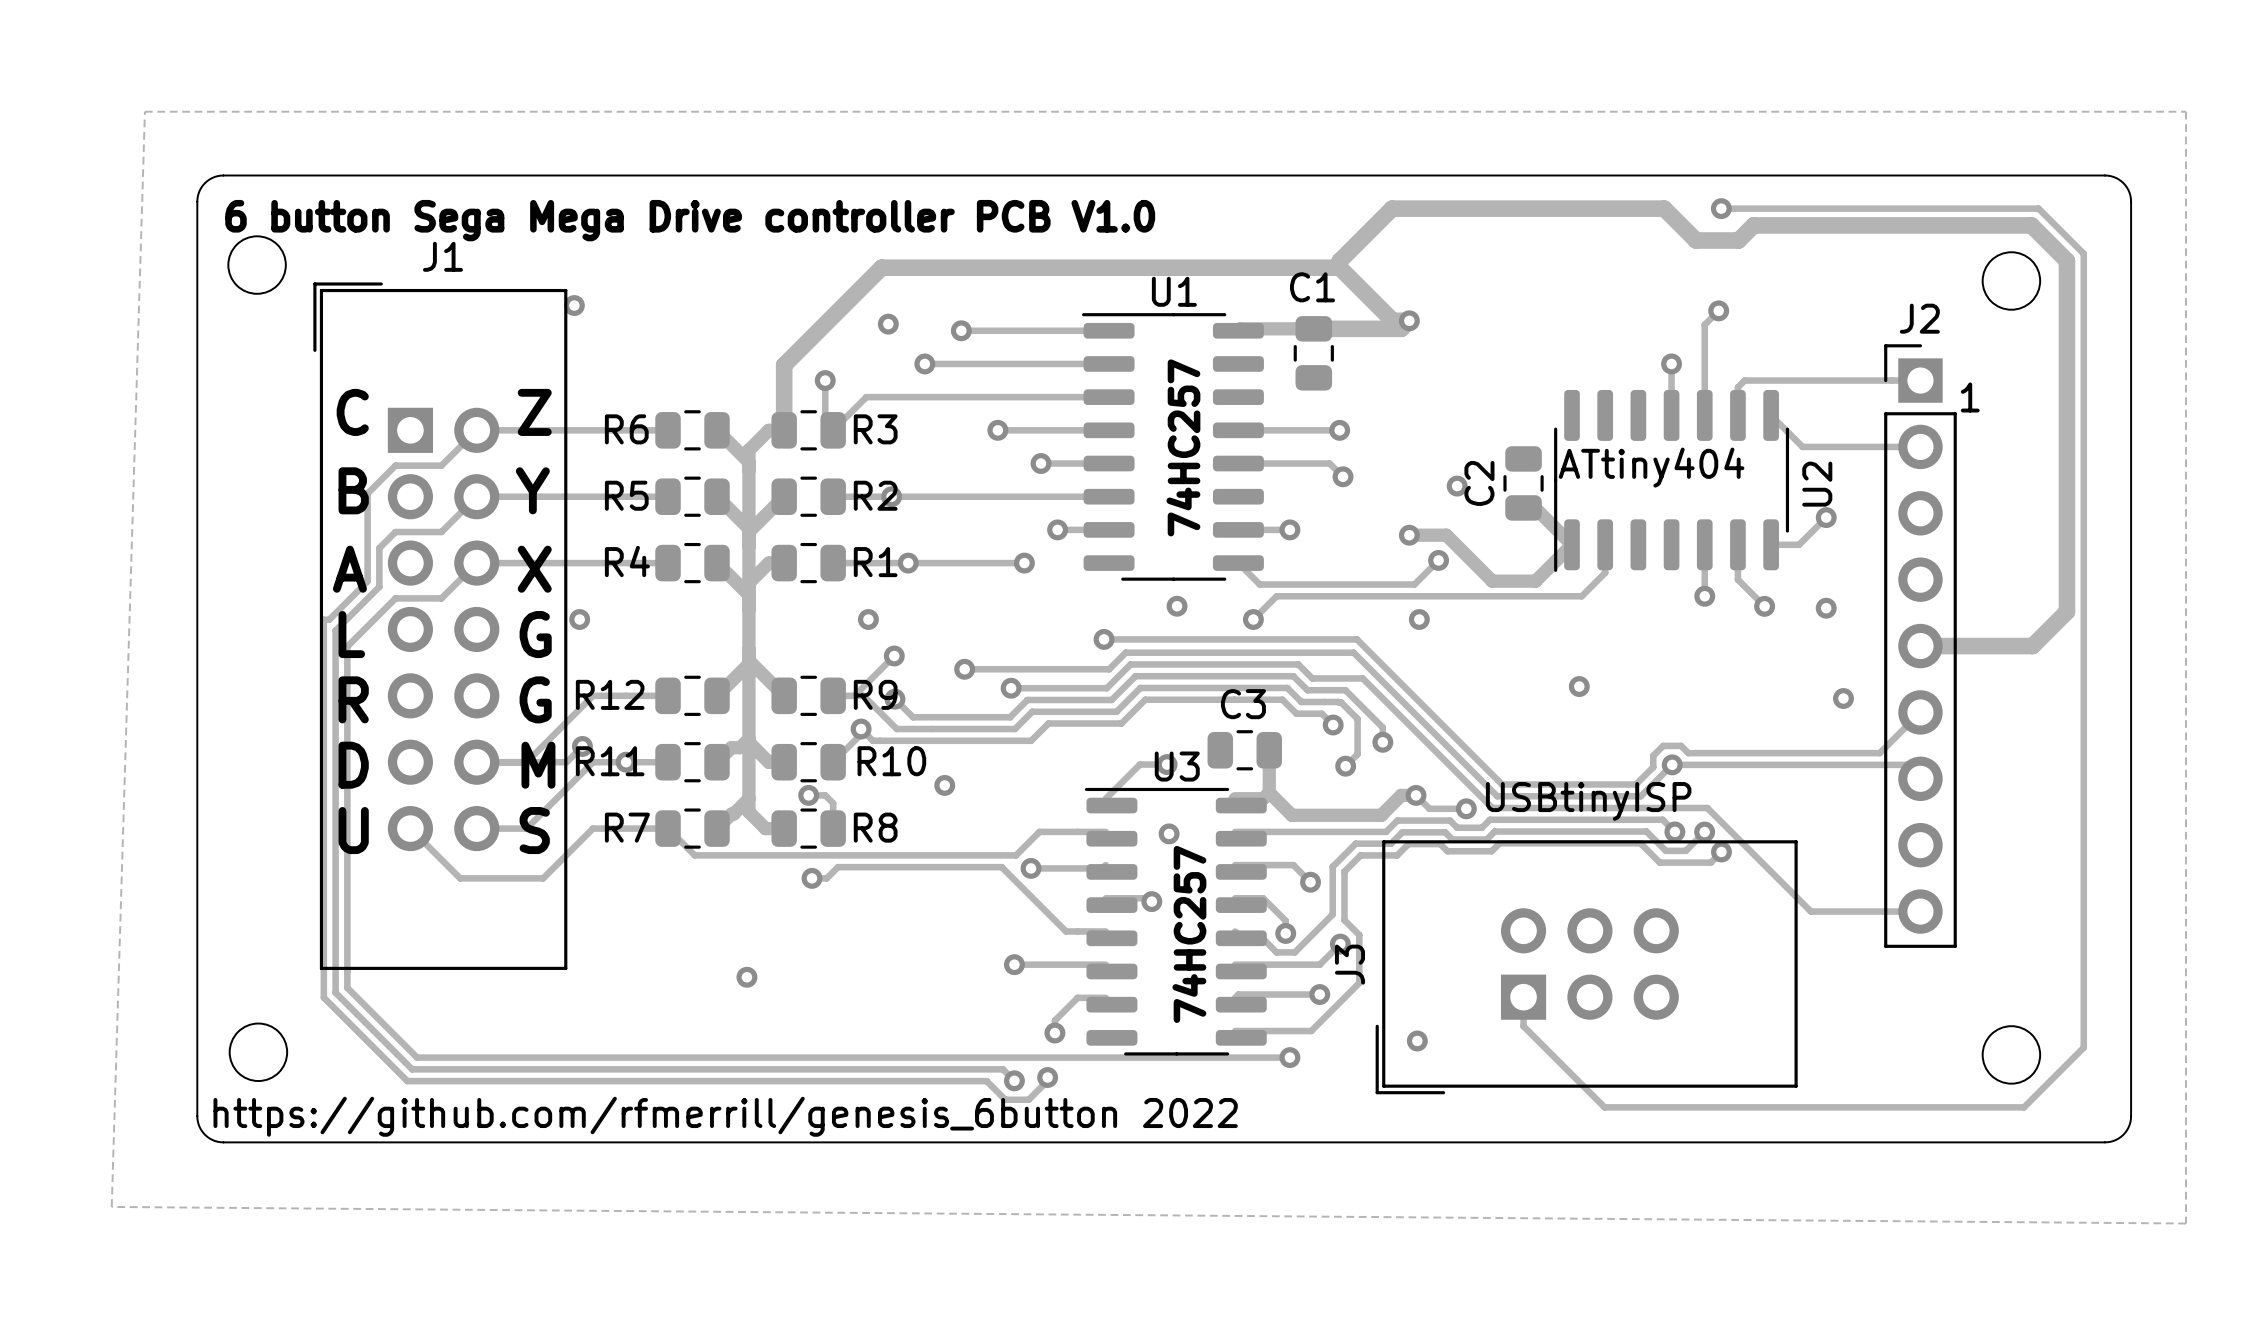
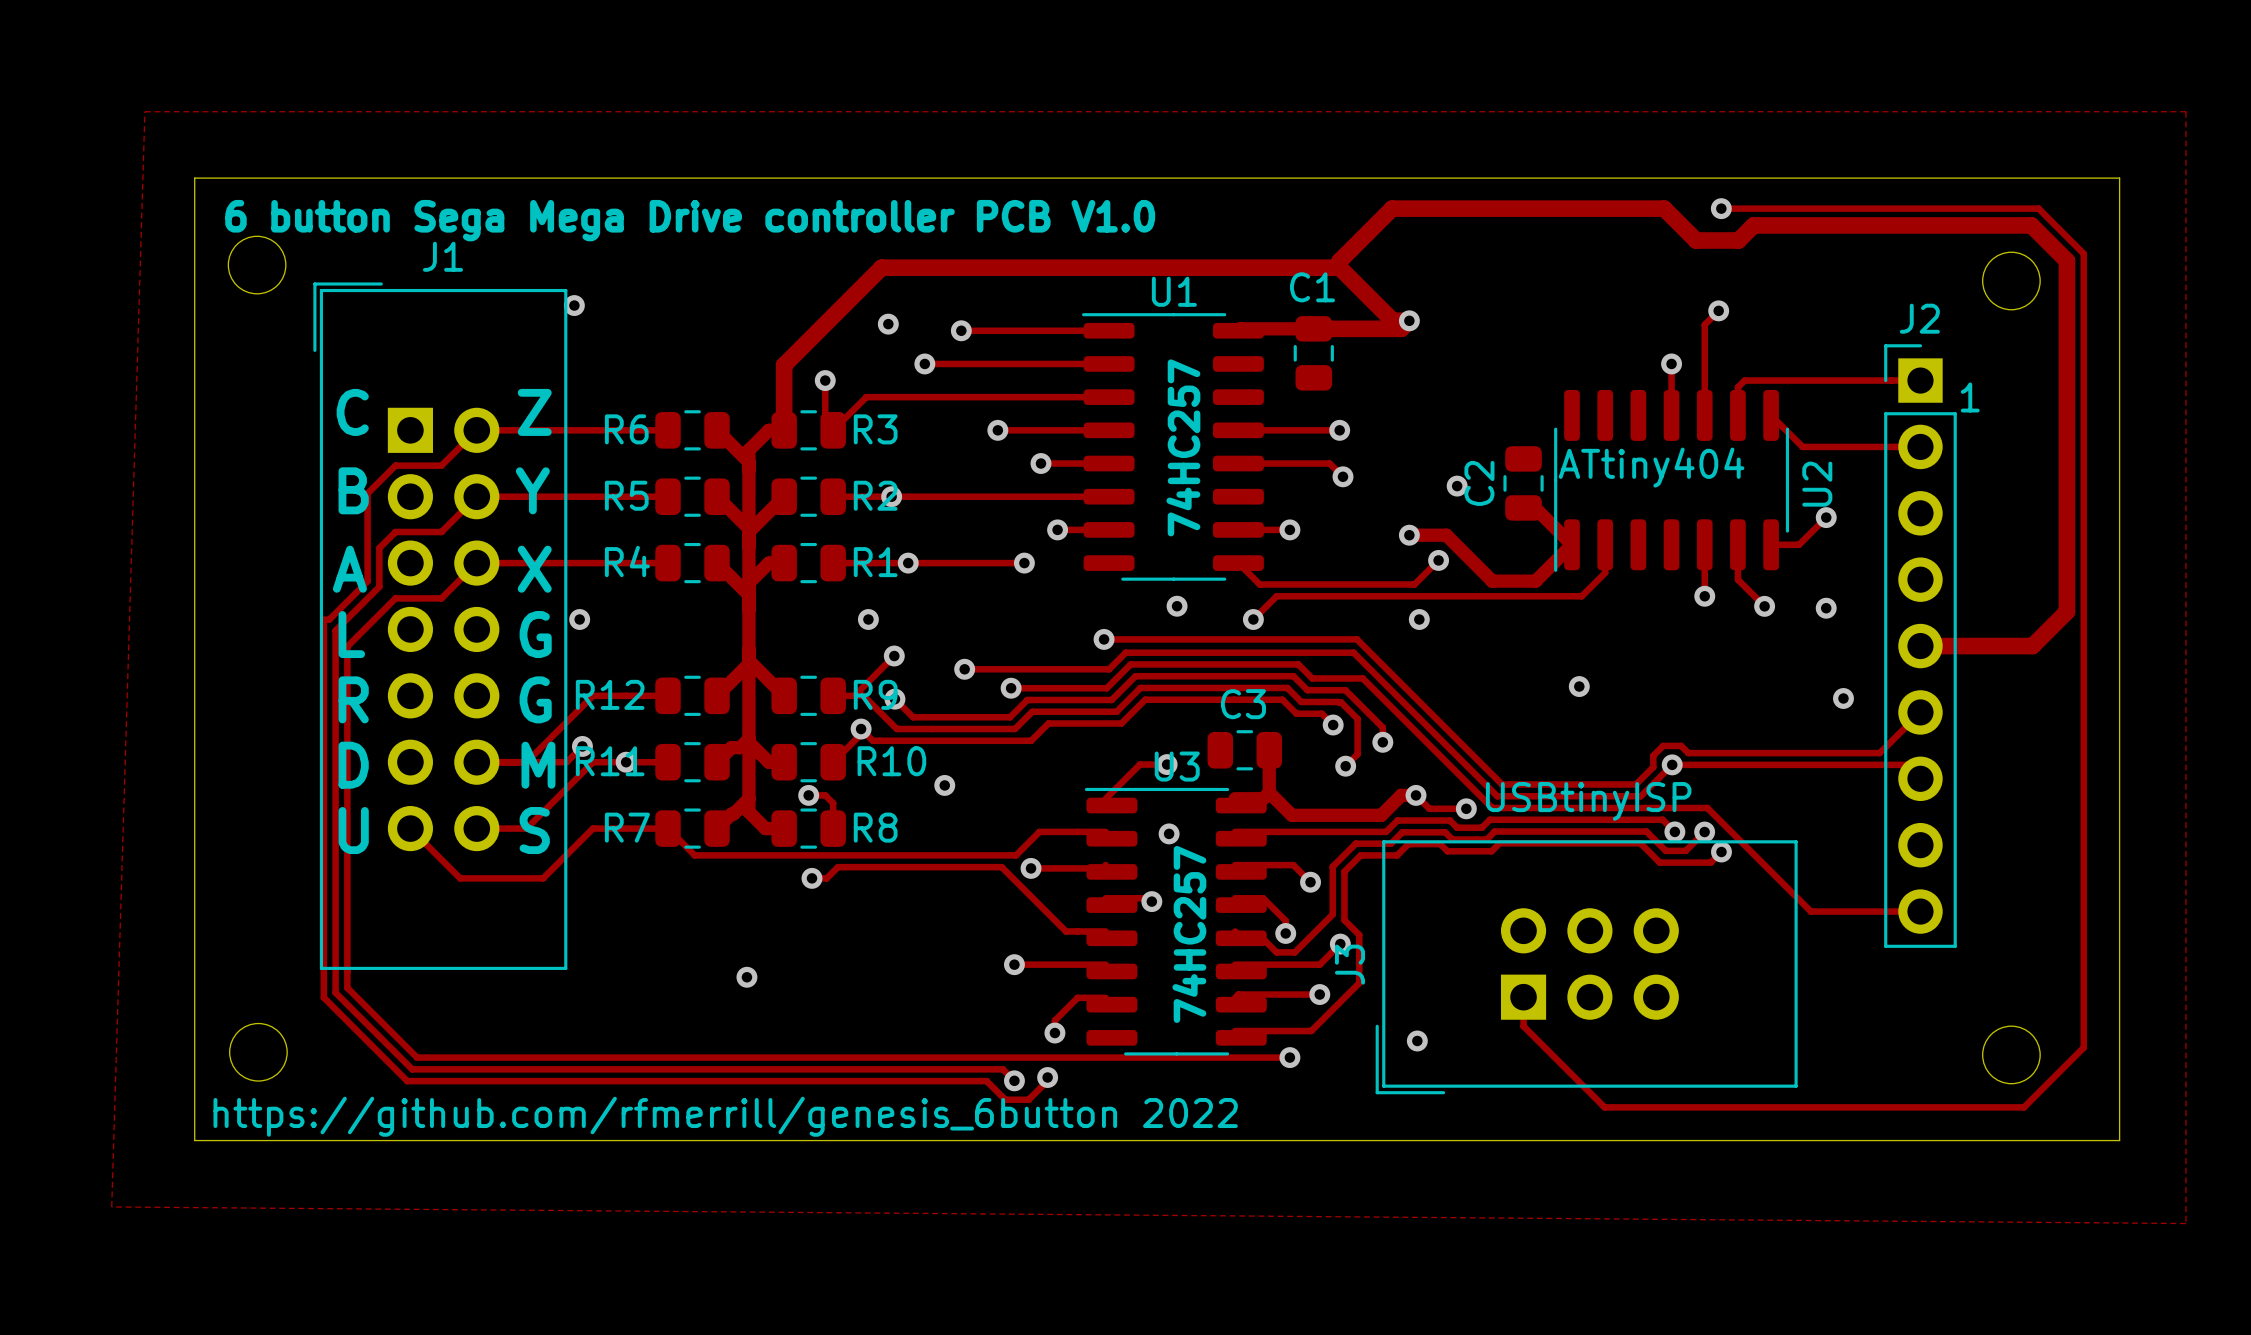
board edge: (223, 175) (2104, 175) (2116, 178) (2127, 187) (2131, 201) (2131, 1116) (2128, 1127) (2118, 1138) (2104, 1142) (223, 1142) (212, 1139) (201, 1130) (197, 1116) (197, 201) (198, 192) (204, 183) (214, 176) (223, 175) -> (194, 178) (194, 1140) (2119, 1140) (2119, 178) (194, 178)

